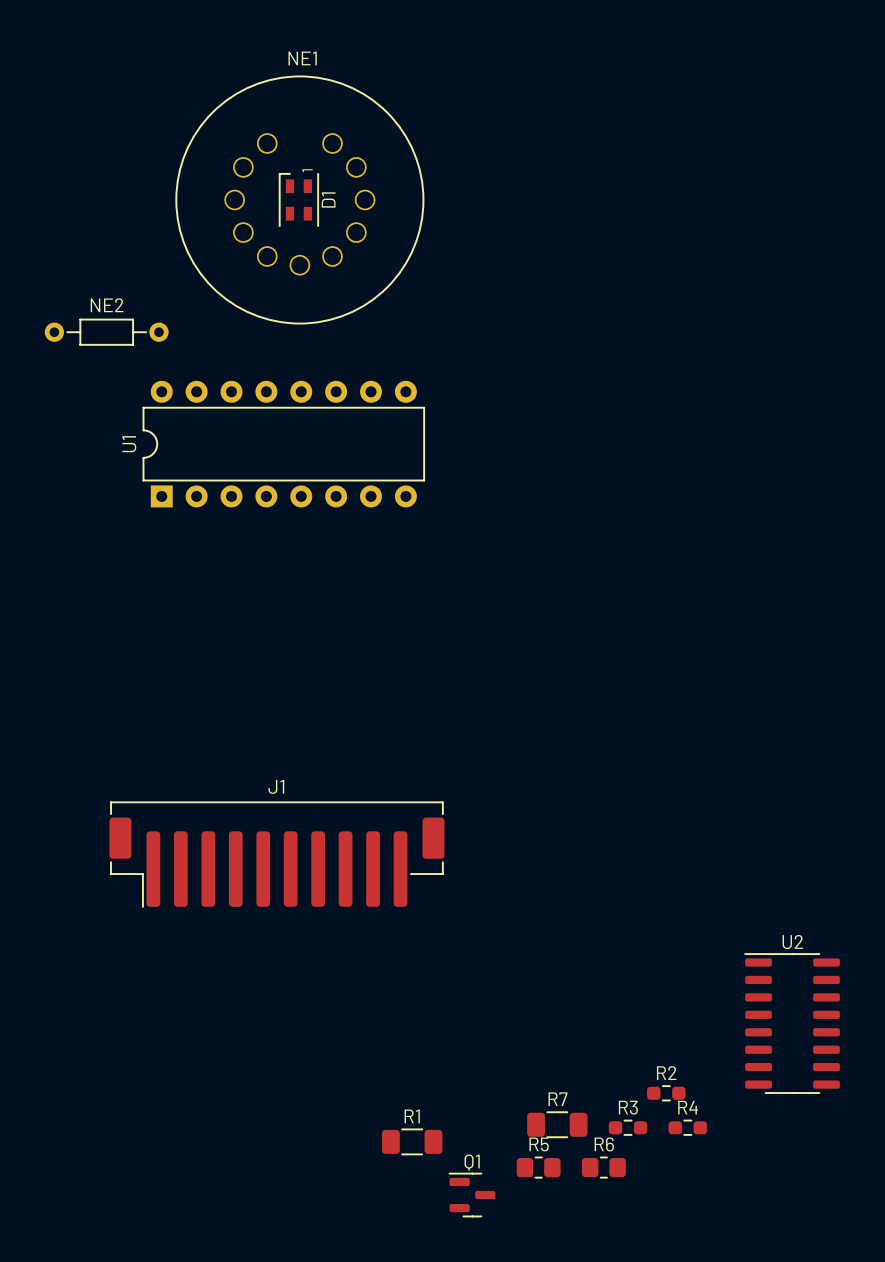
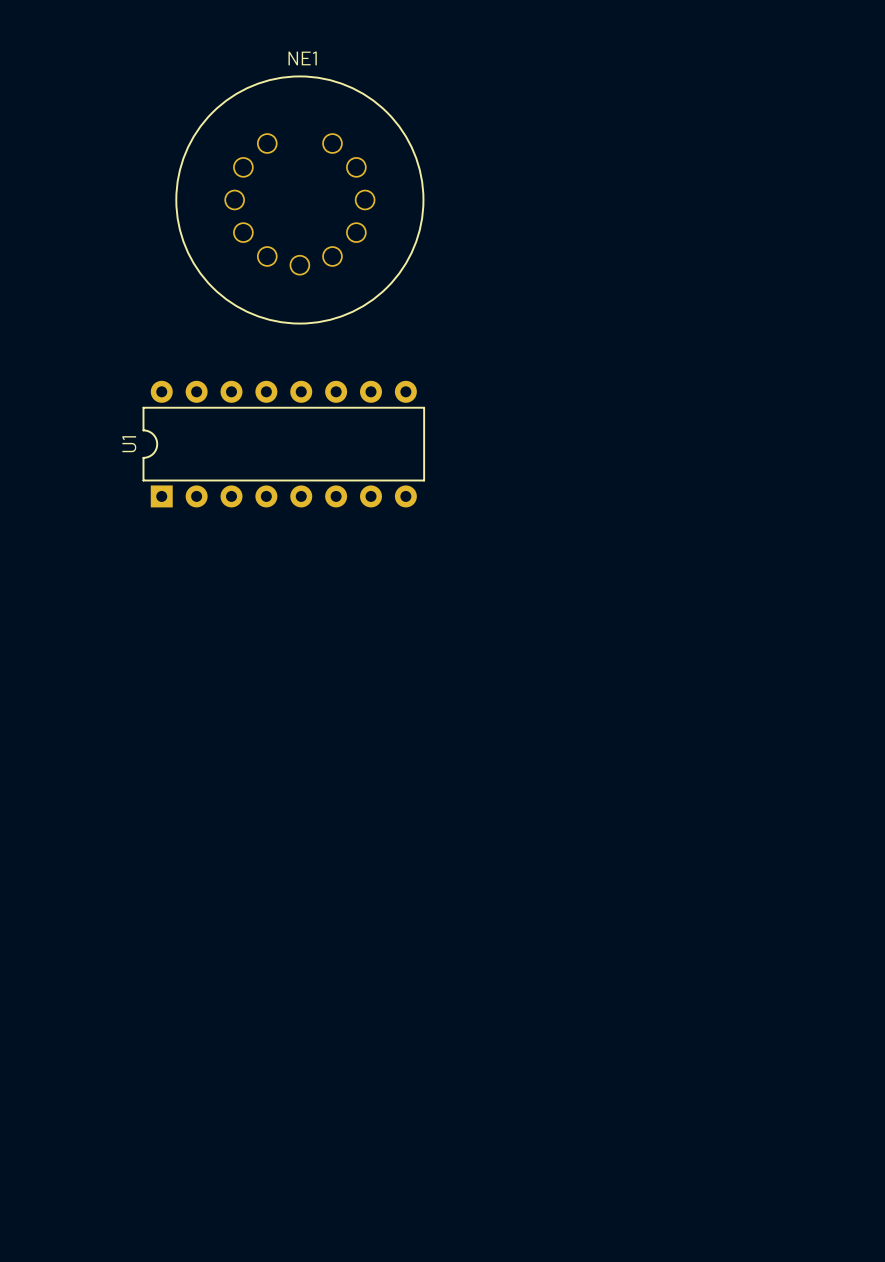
D1: (298, 199) -> none
NE2: (106, 332) -> none
J1: (276, 854) -> none
U2: (792, 1023) -> none
R2: (666, 1093) -> none
R7: (557, 1124) -> none
R3: (628, 1127) -> none
R4: (687, 1127) -> none
R1: (412, 1141) -> none
R5: (538, 1167) -> none
R6: (603, 1167) -> none
Q1: (472, 1195) -> none

